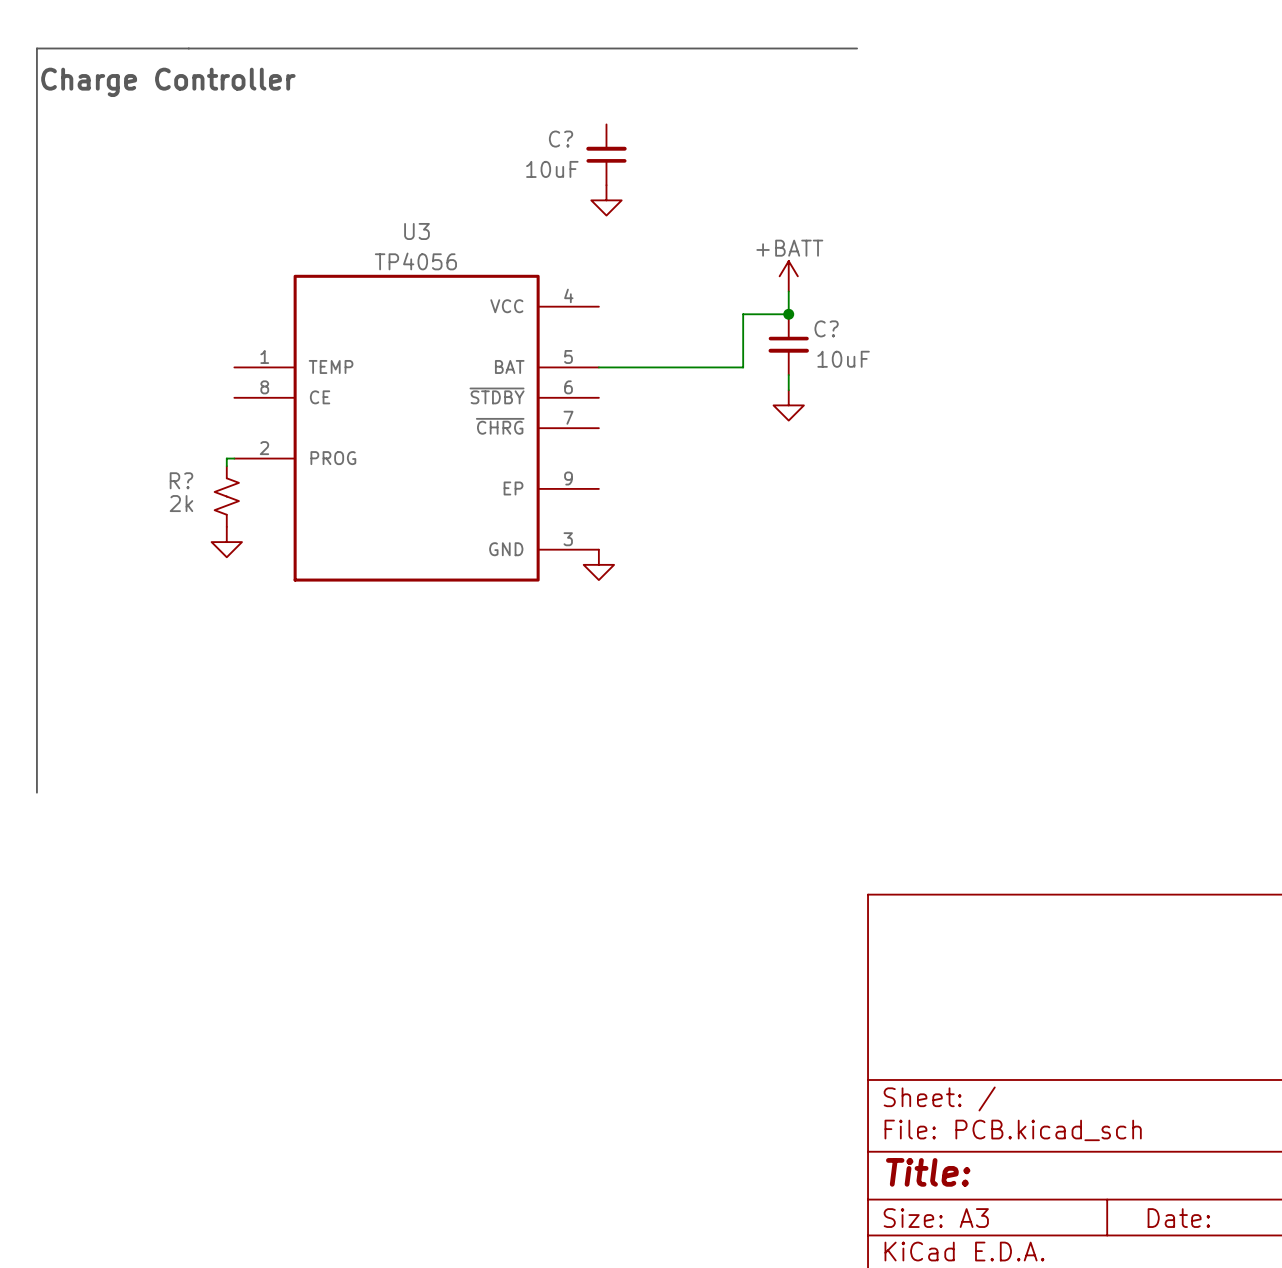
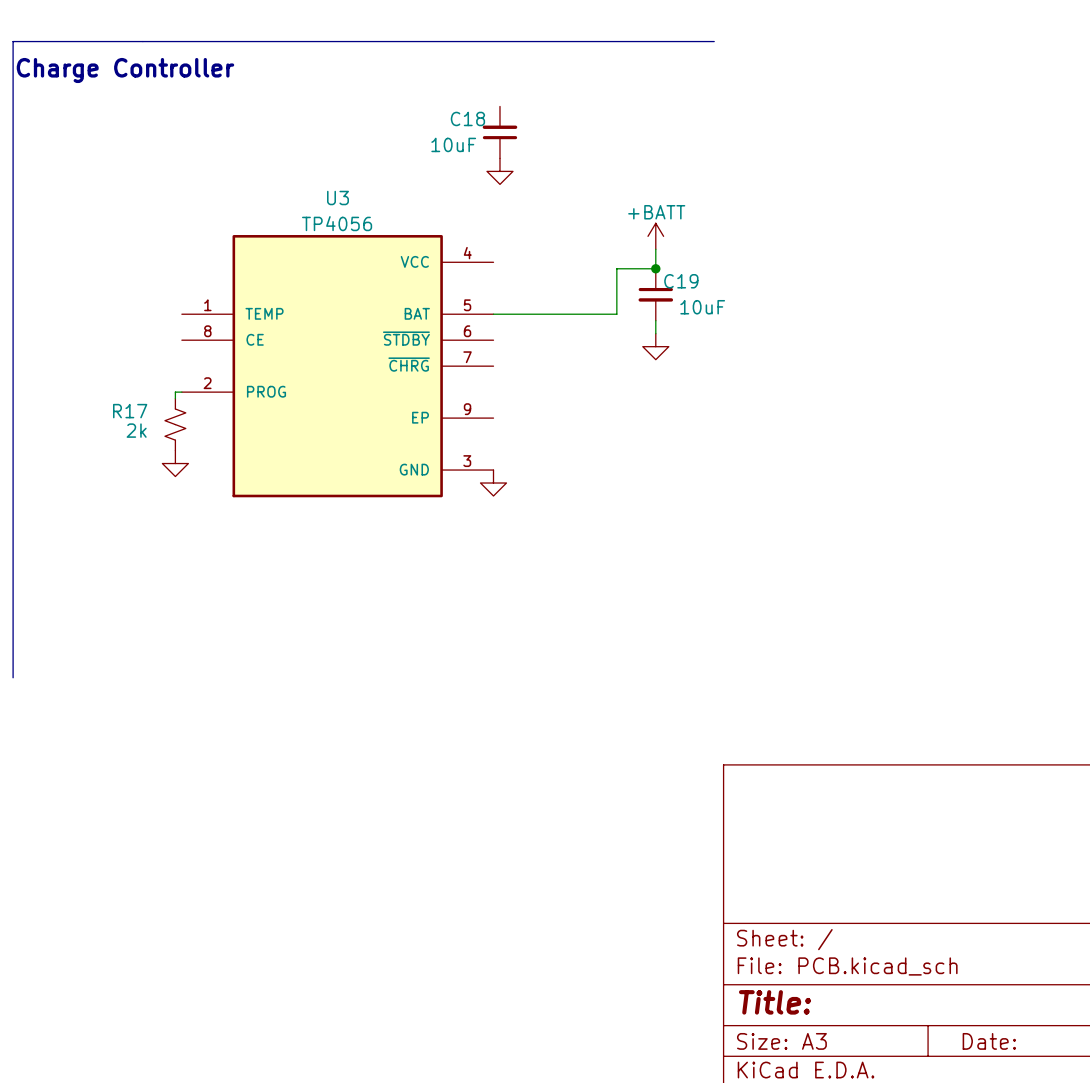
C? name: C? (561, 139) -> C18 (467, 118)
C? name: C? (826, 328) -> C19 (681, 281)
R? name: R? (181, 480) -> R17 (130, 411)

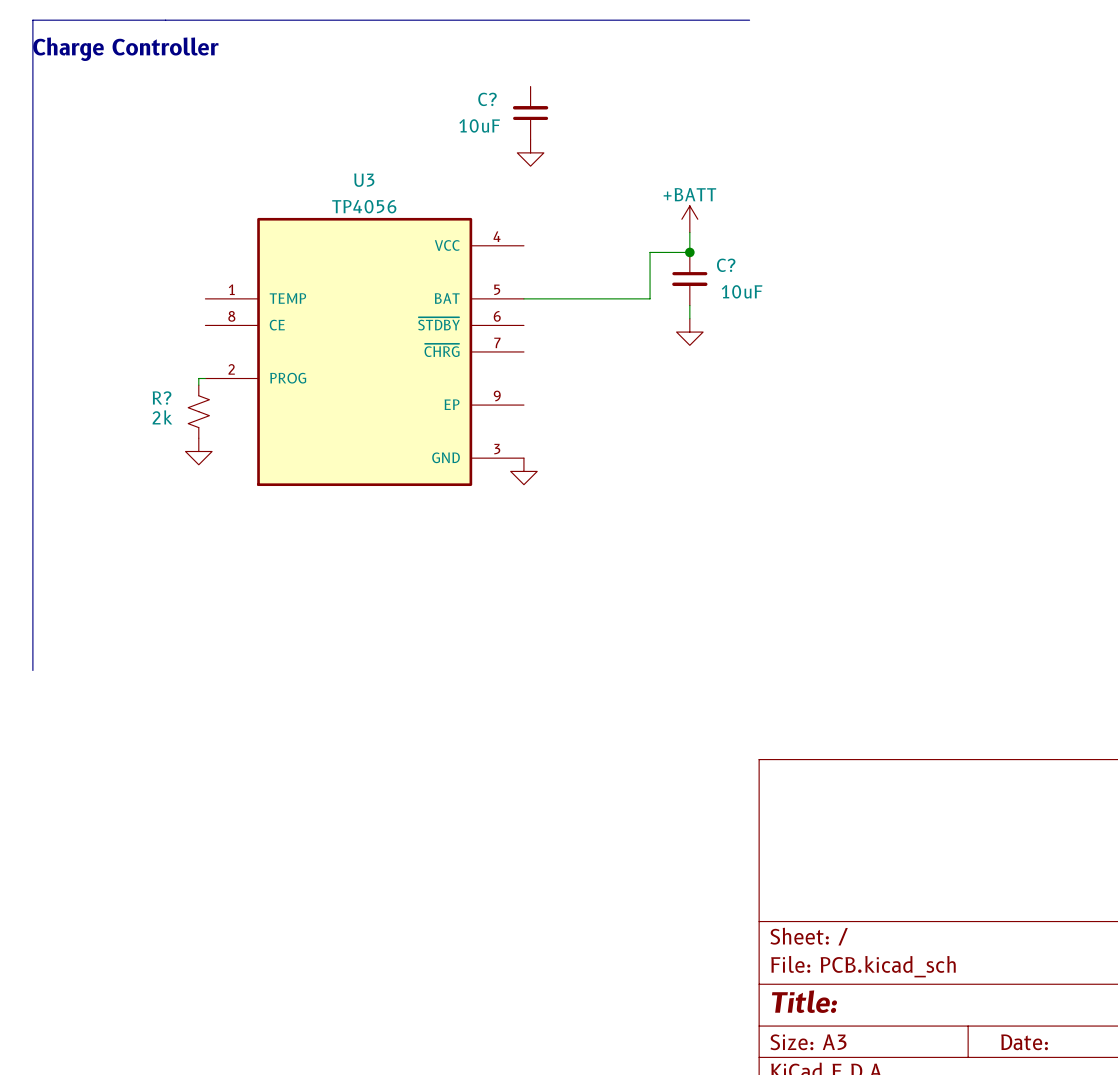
C18 name: C18 (467, 118) -> C? (487, 99)
C19 name: C19 (681, 281) -> C? (726, 265)
R17 name: R17 (130, 411) -> R? (162, 398)

